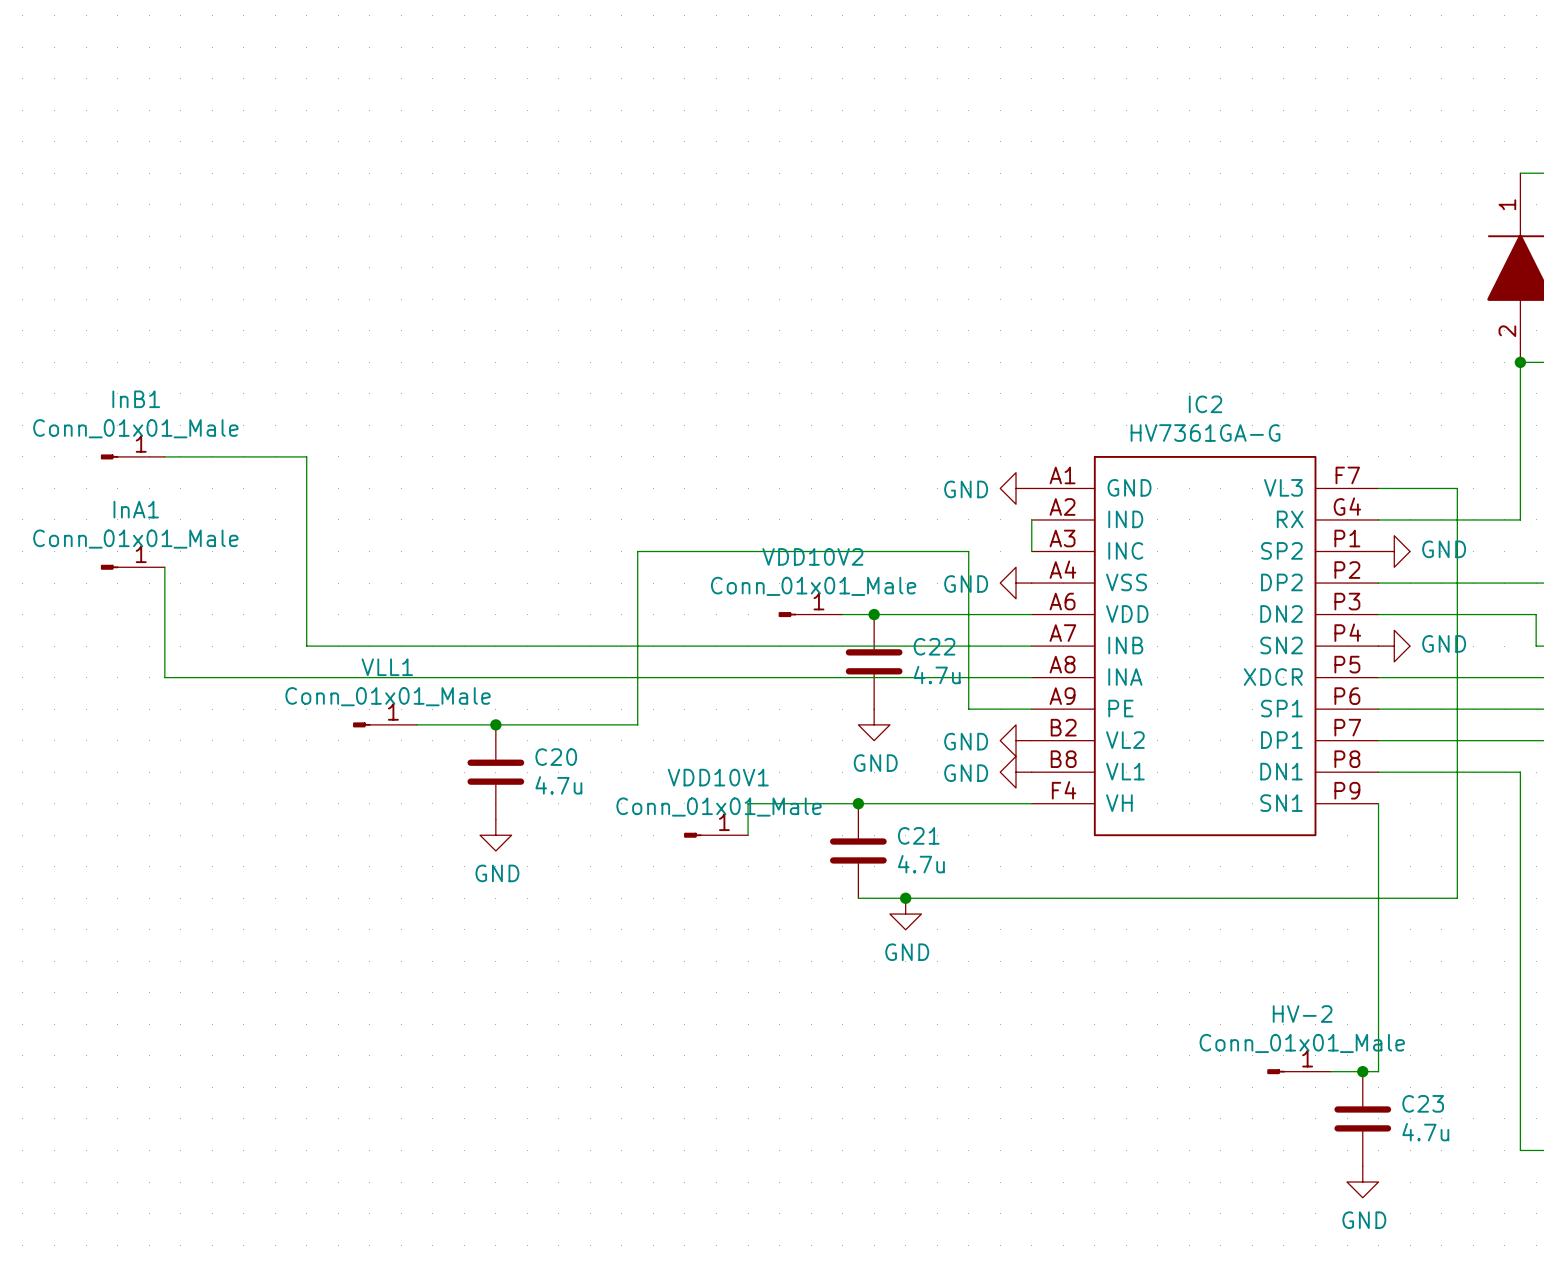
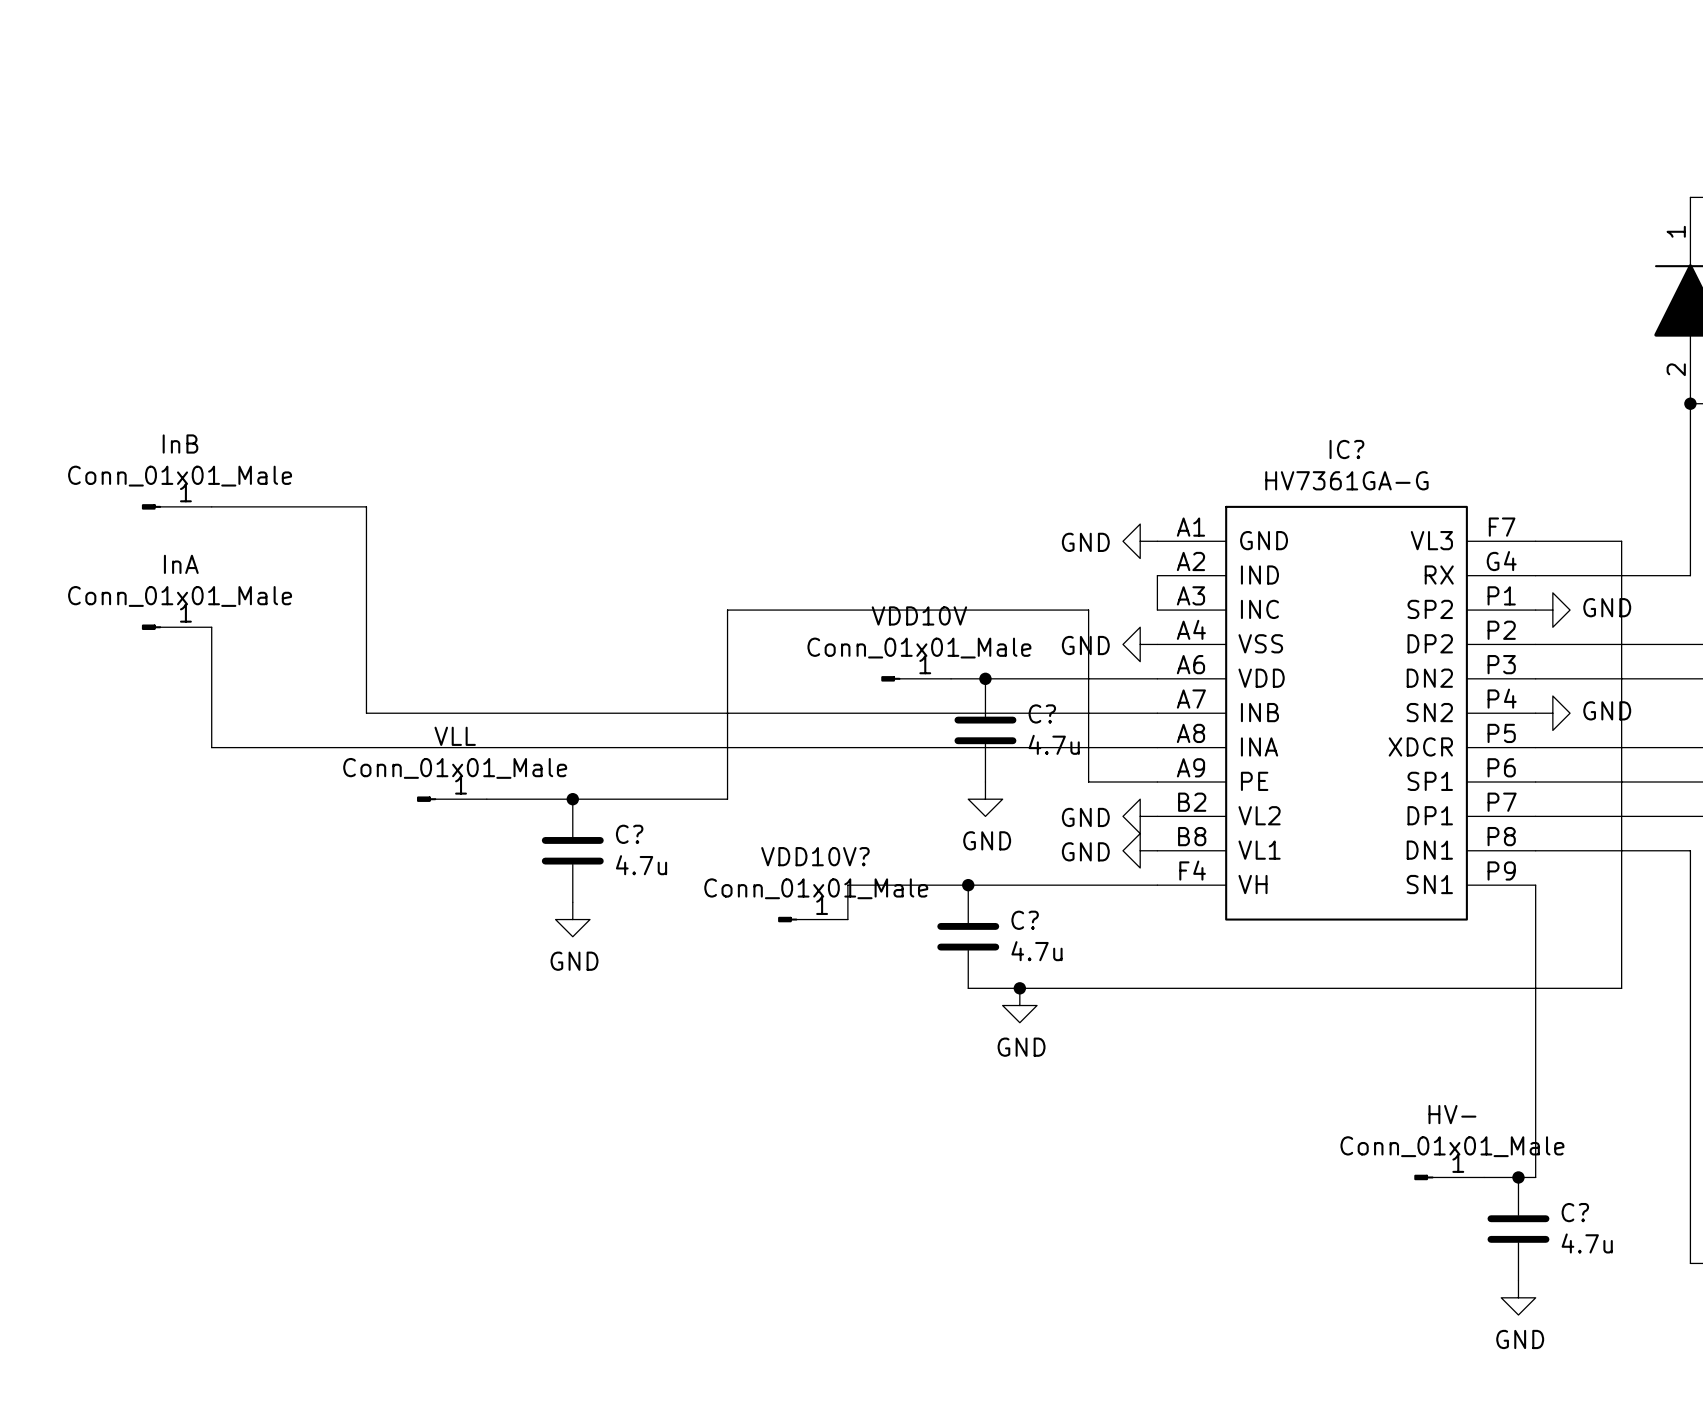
InB1 name: InB1 (136, 399) -> InB (180, 444)
IC2 name: IC2 (1205, 404) -> IC? (1346, 449)
InA1 name: InA1 (136, 509) -> InA (181, 564)
VDD10V2 name: VDD10V2 (812, 556) -> VDD10V (919, 615)
C22 name: C22 (934, 646) -> C? (1042, 713)
VLL1 name: VLL1 (387, 667) -> VLL (455, 736)
C20 name: C20 (556, 757) -> C? (629, 834)
VDD10V1 name: VDD10V1 (718, 777) -> VDD10V? (815, 856)
C21 name: C21 (918, 835) -> C? (1025, 920)
HV-2 name: HV-2 (1302, 1014) -> HV- (1452, 1114)
C23 name: C23 (1423, 1103) -> C? (1575, 1212)

